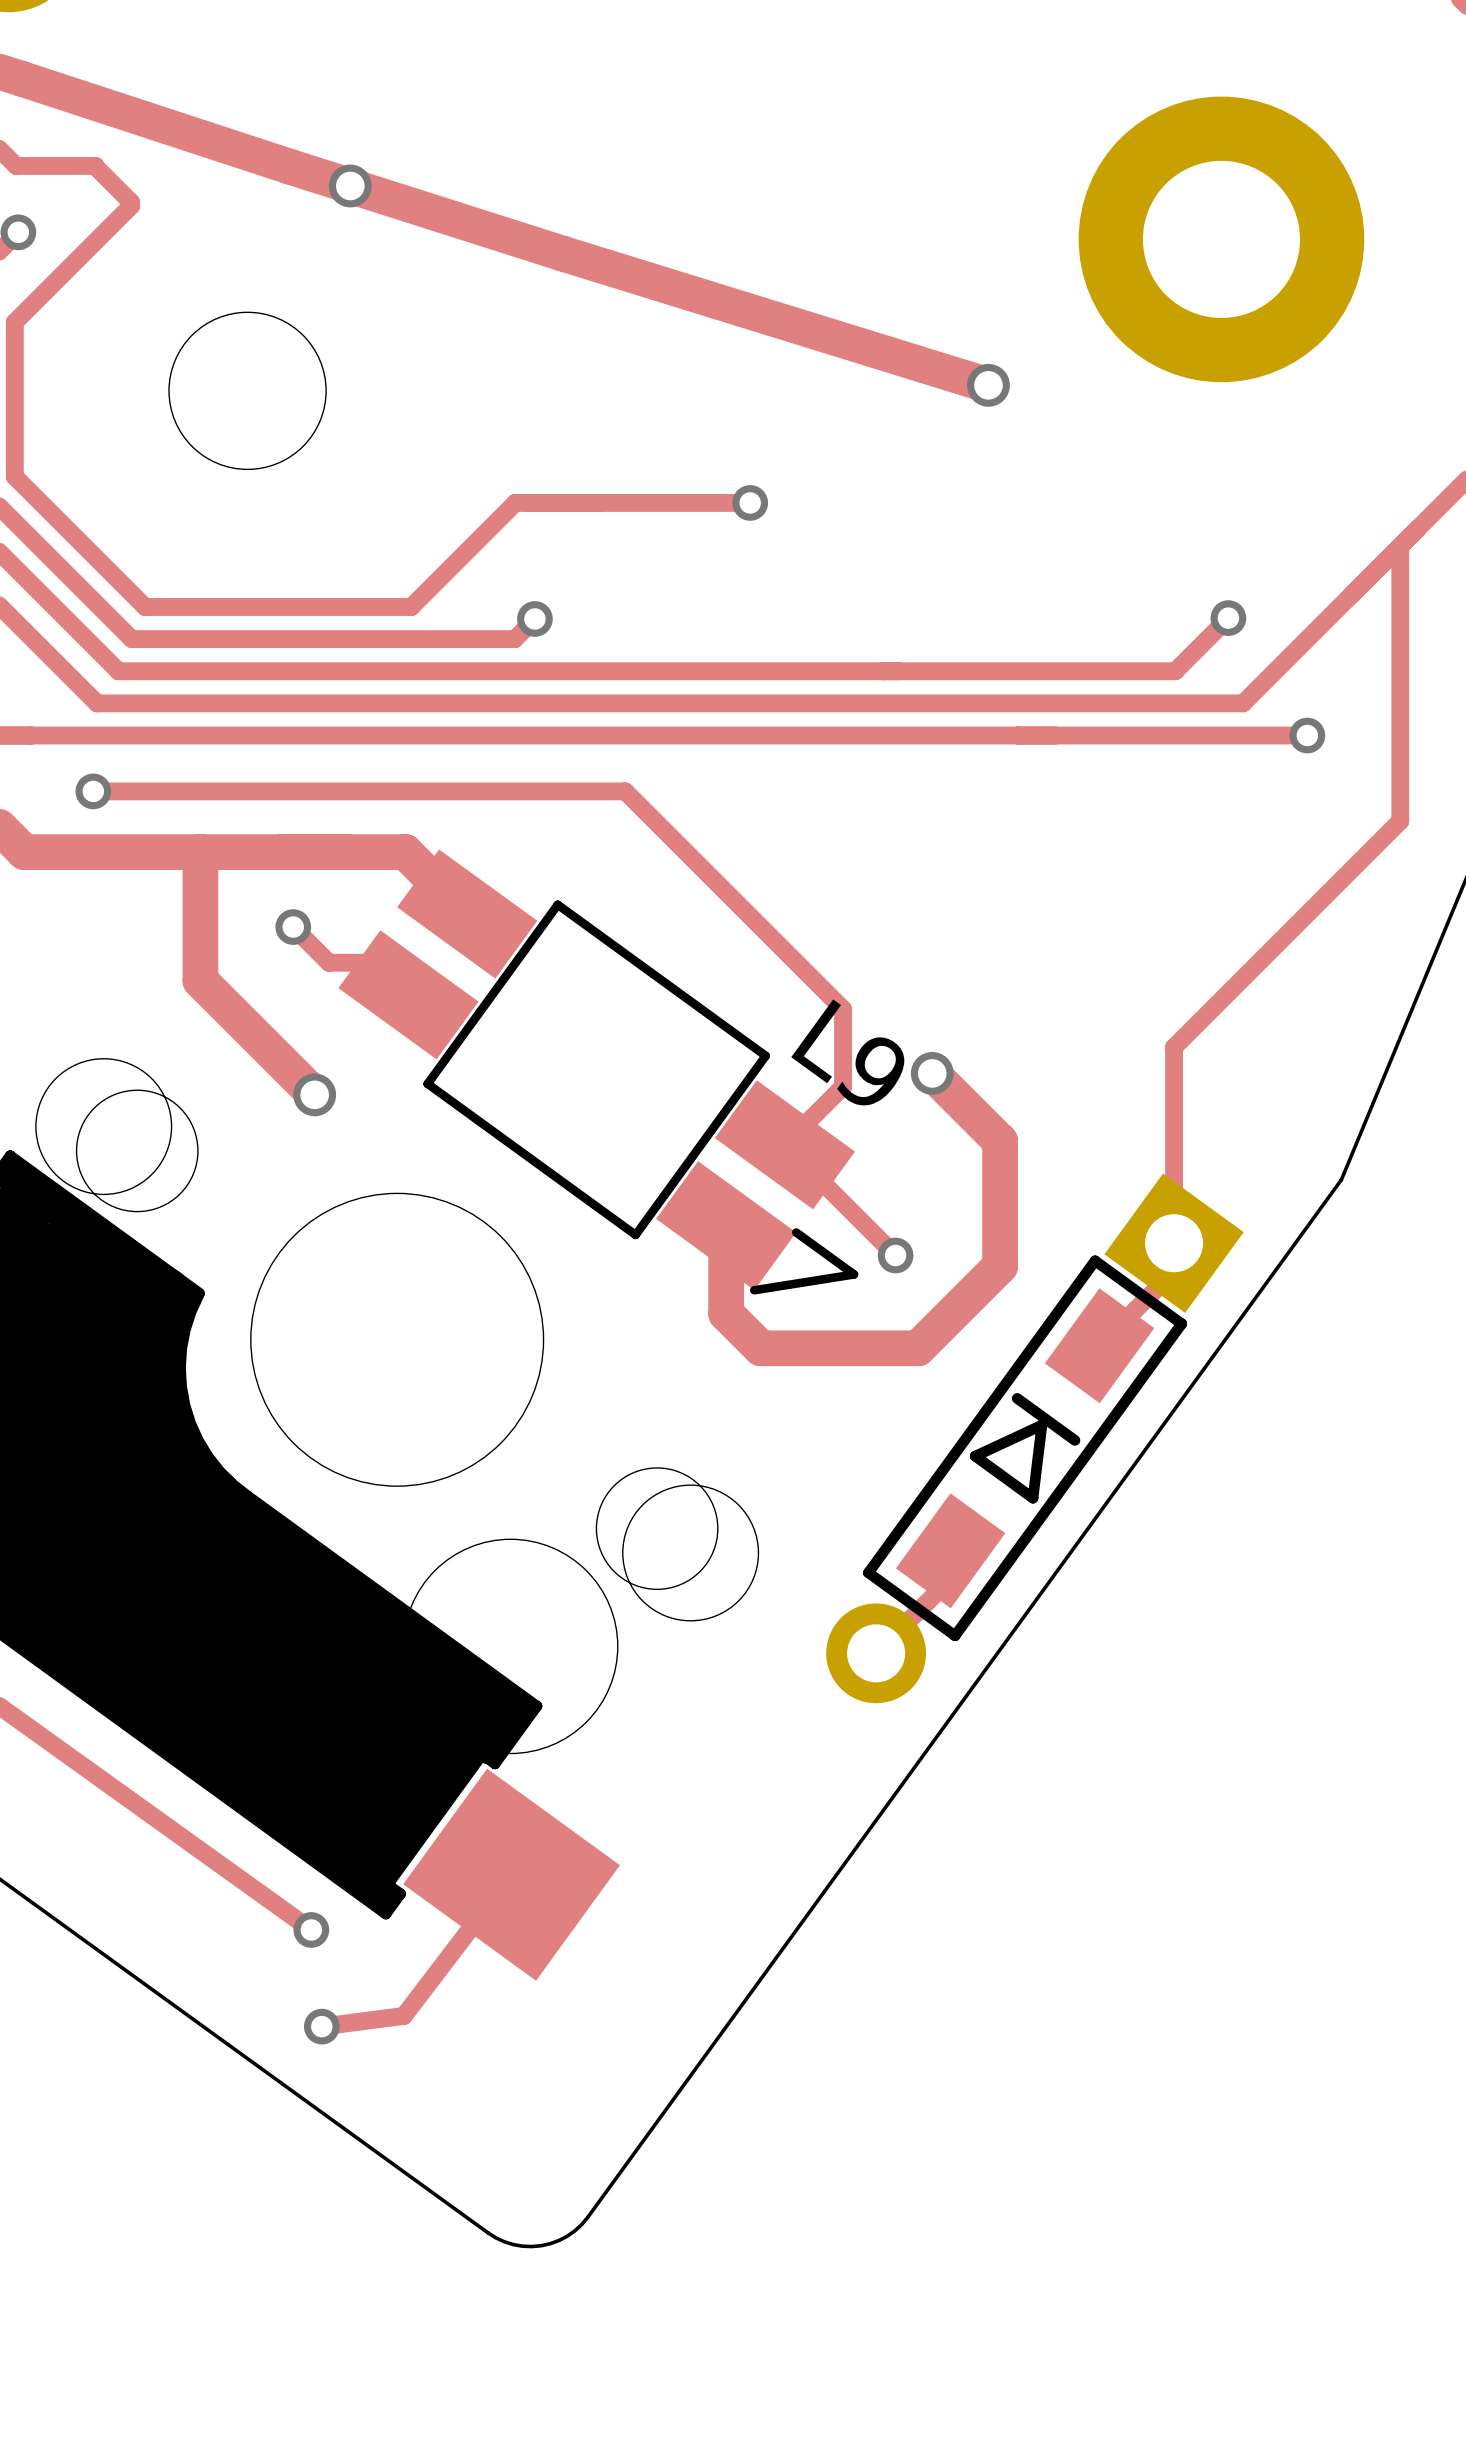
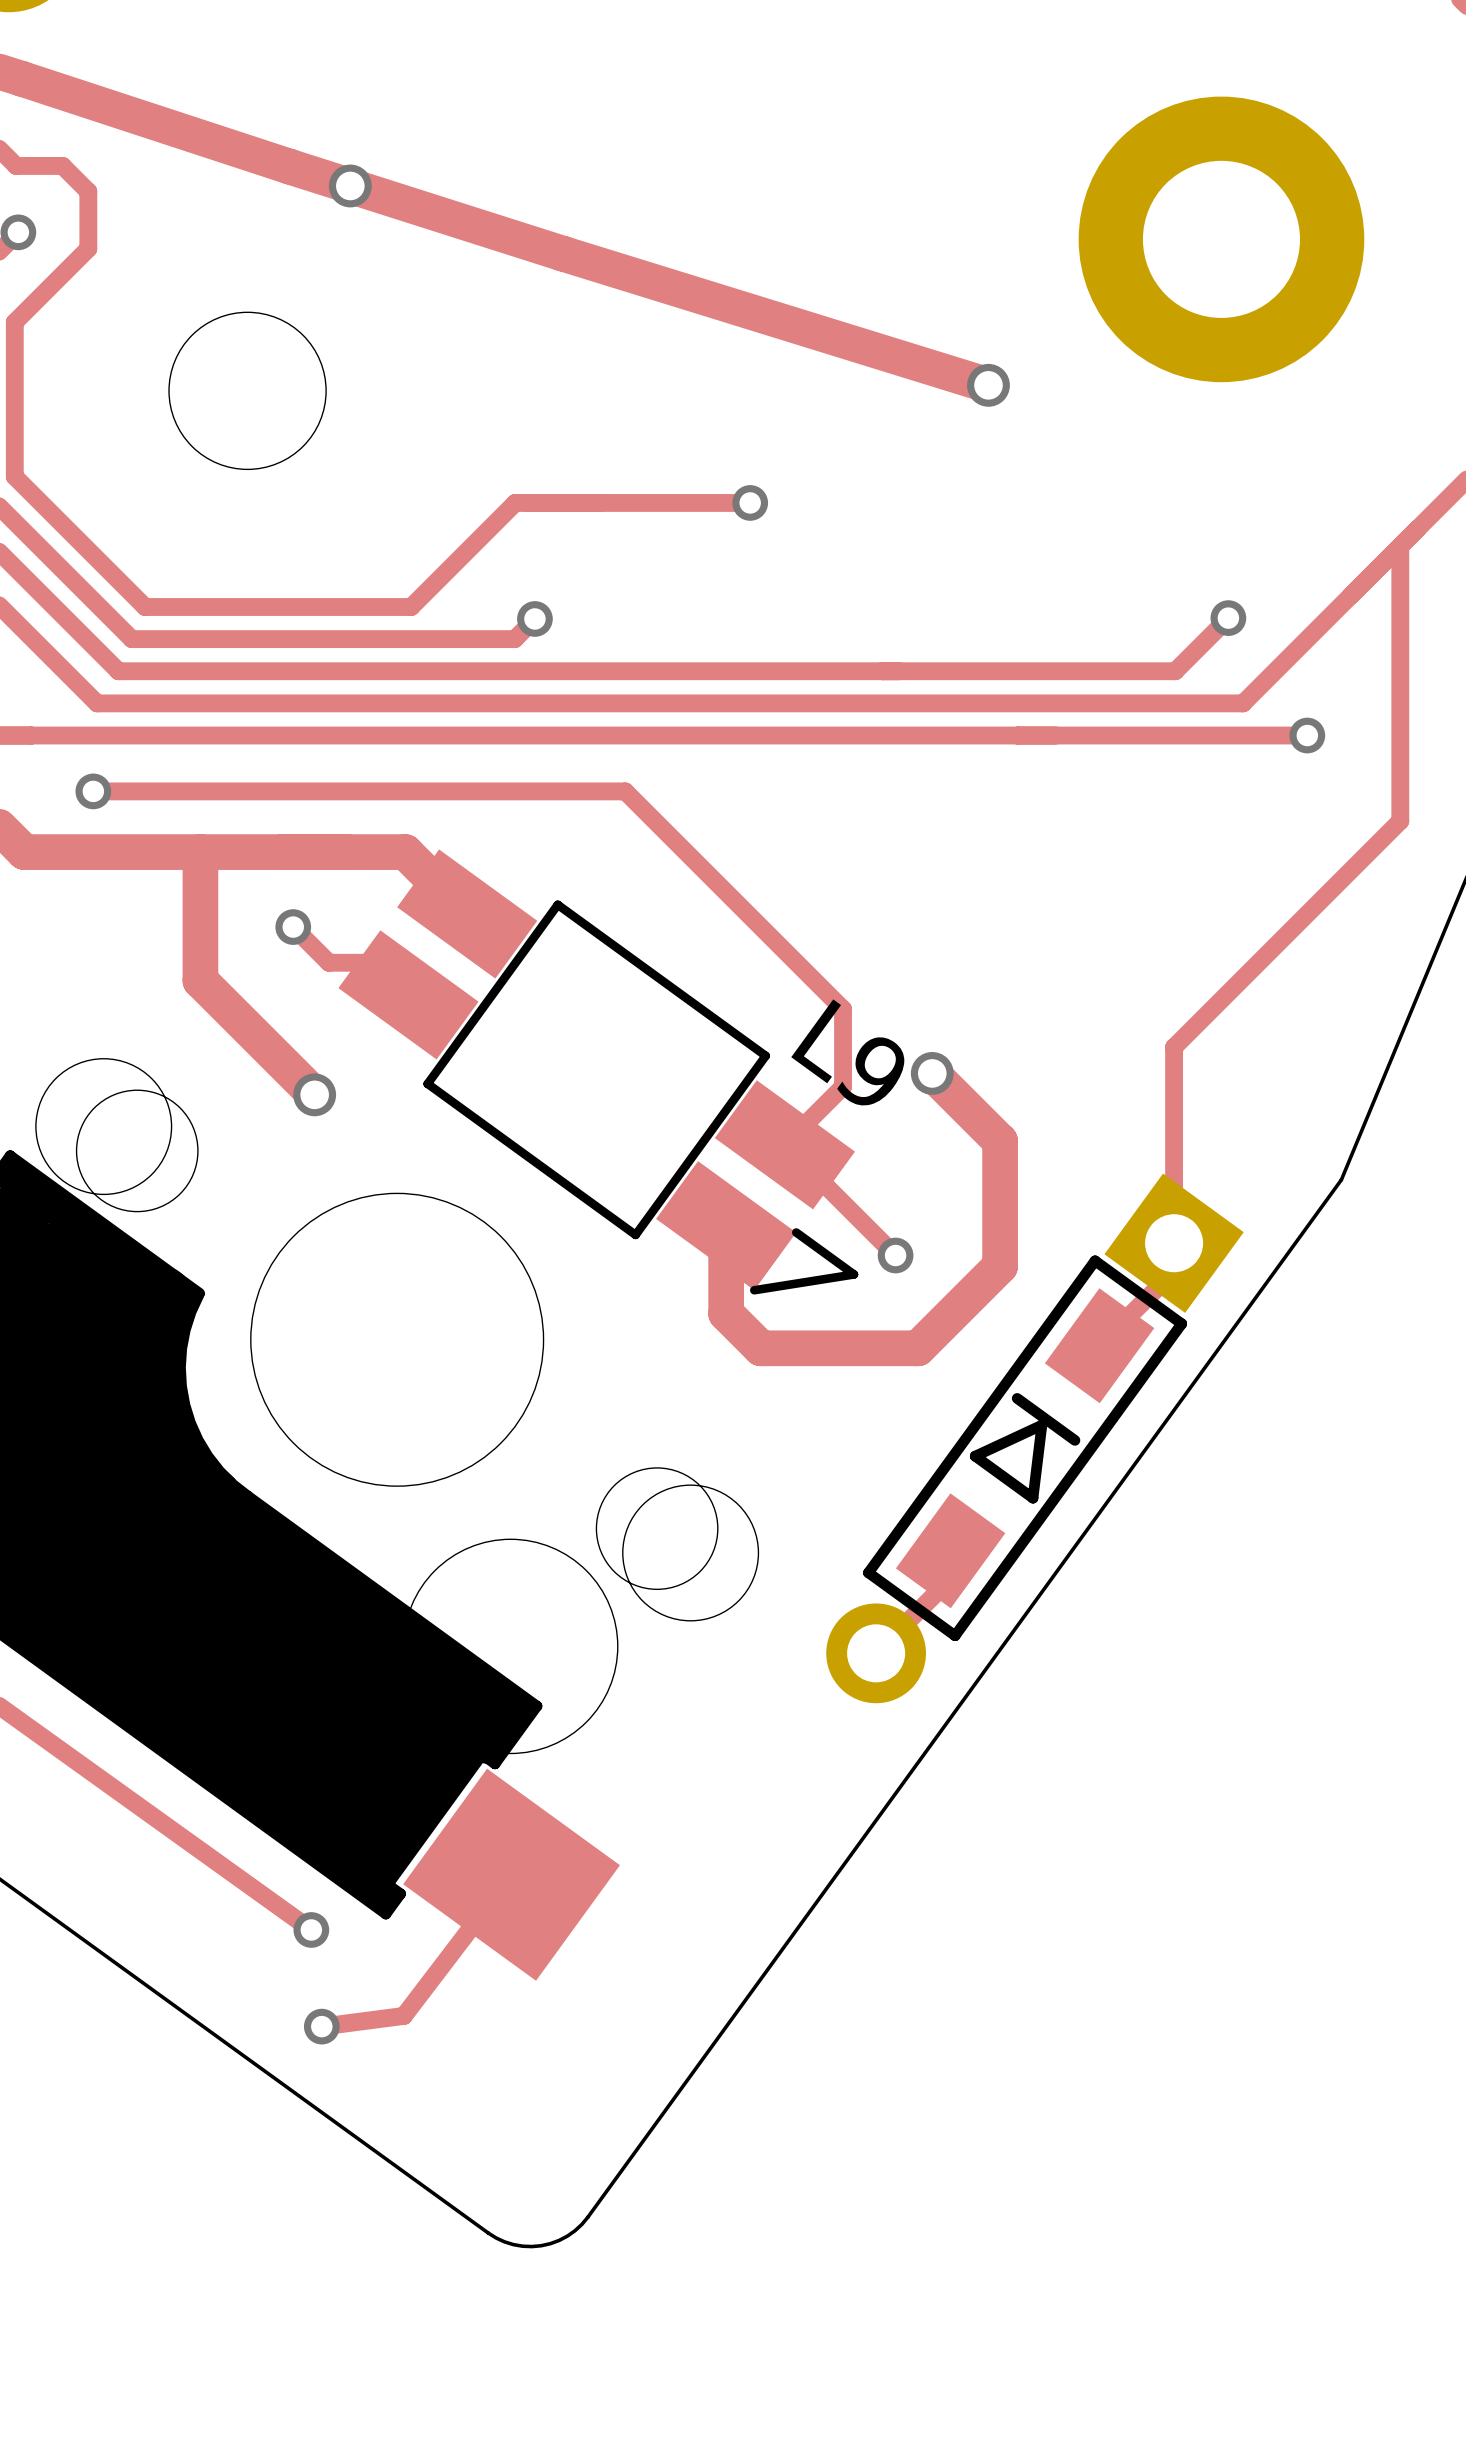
track: (62, 165) (95, 165) -> none
track: (95, 166) (131, 202) (131, 205) (88, 248) -> (62, 165) (88, 191) (88, 248)

